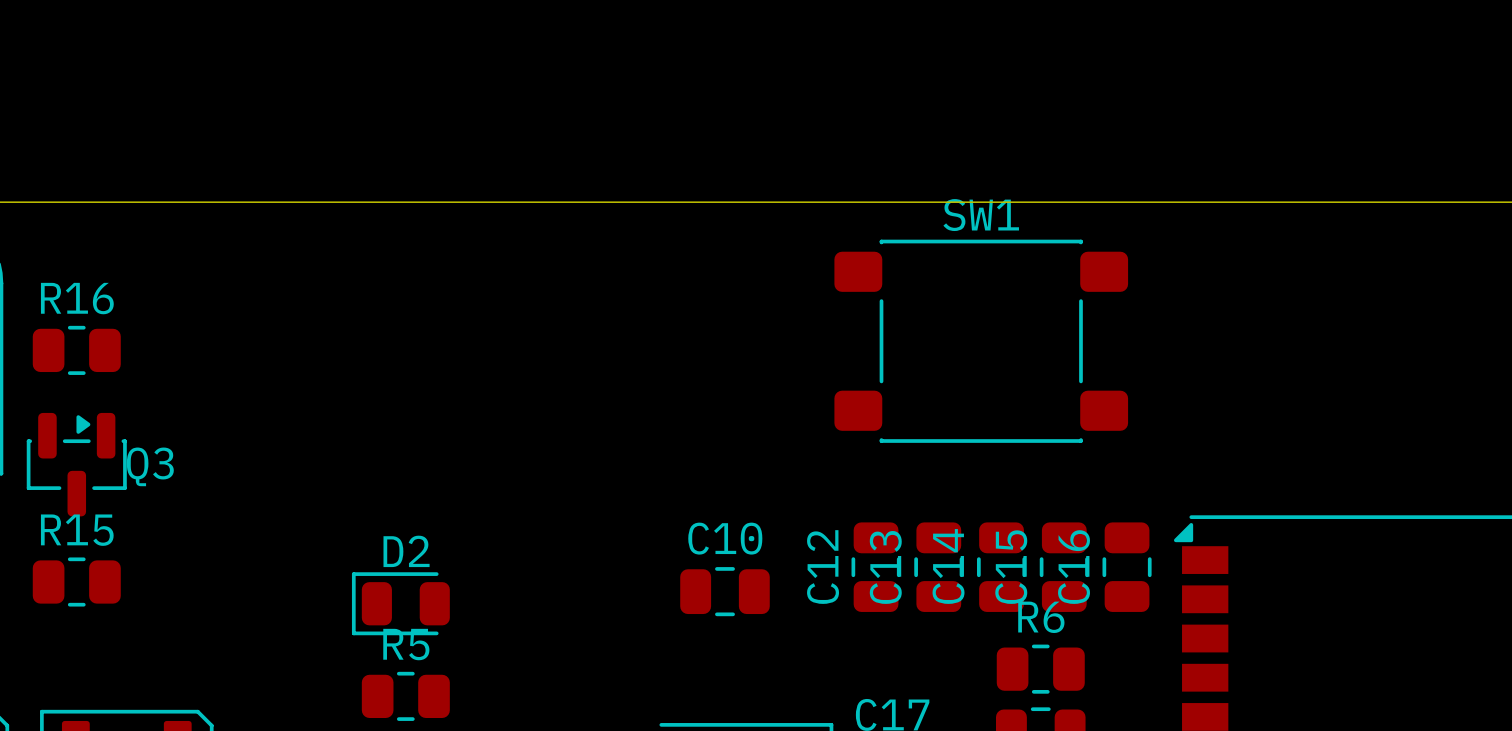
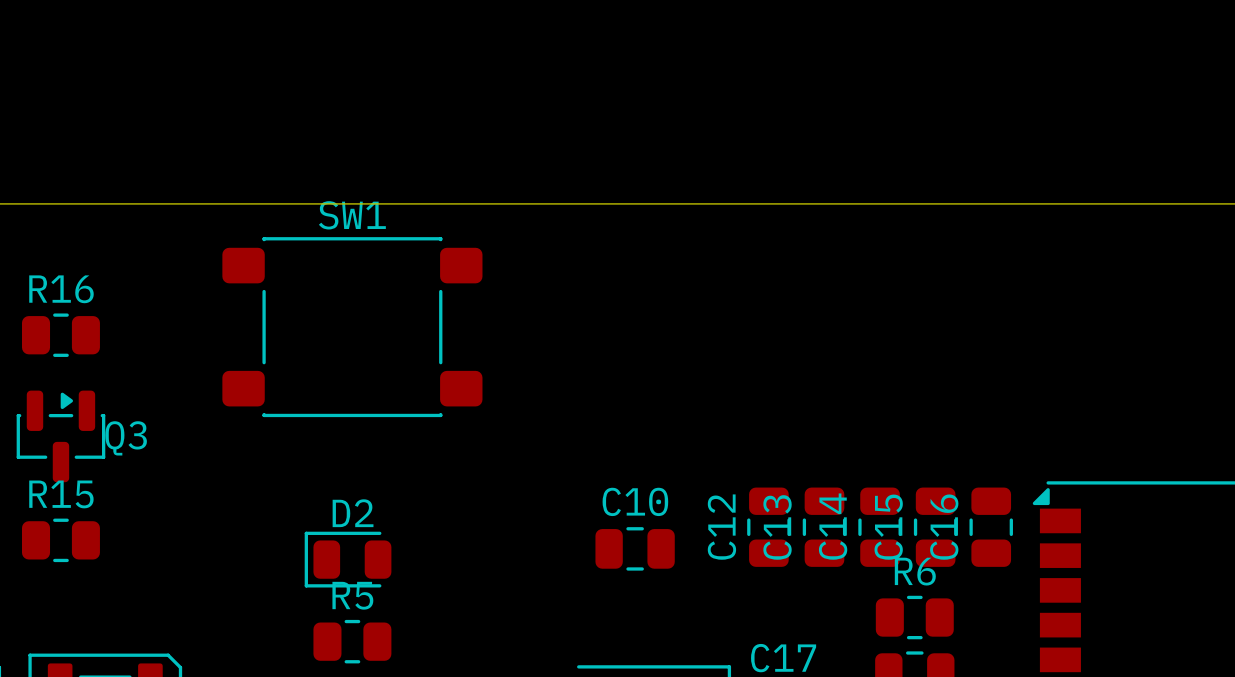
SW1 position: (981, 341) -> (352, 327)

